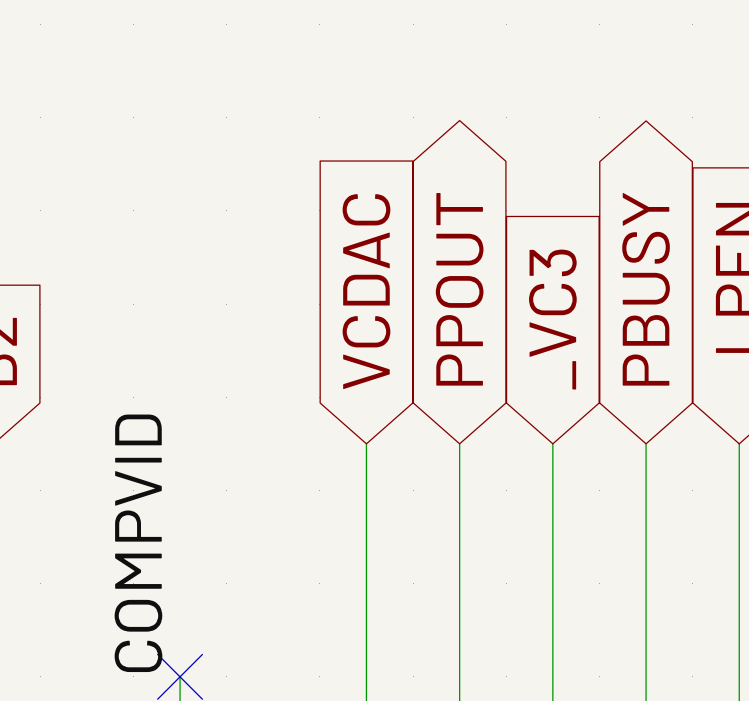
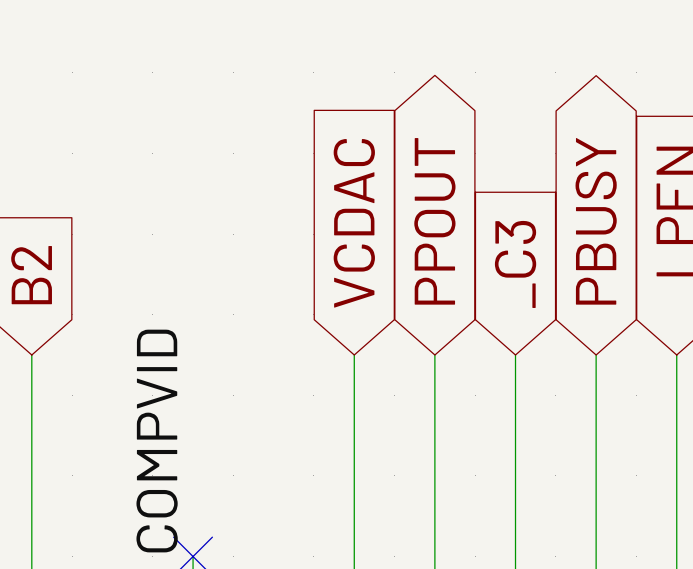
global label: _VC3 (552, 319) -> _C3 (515, 264)

